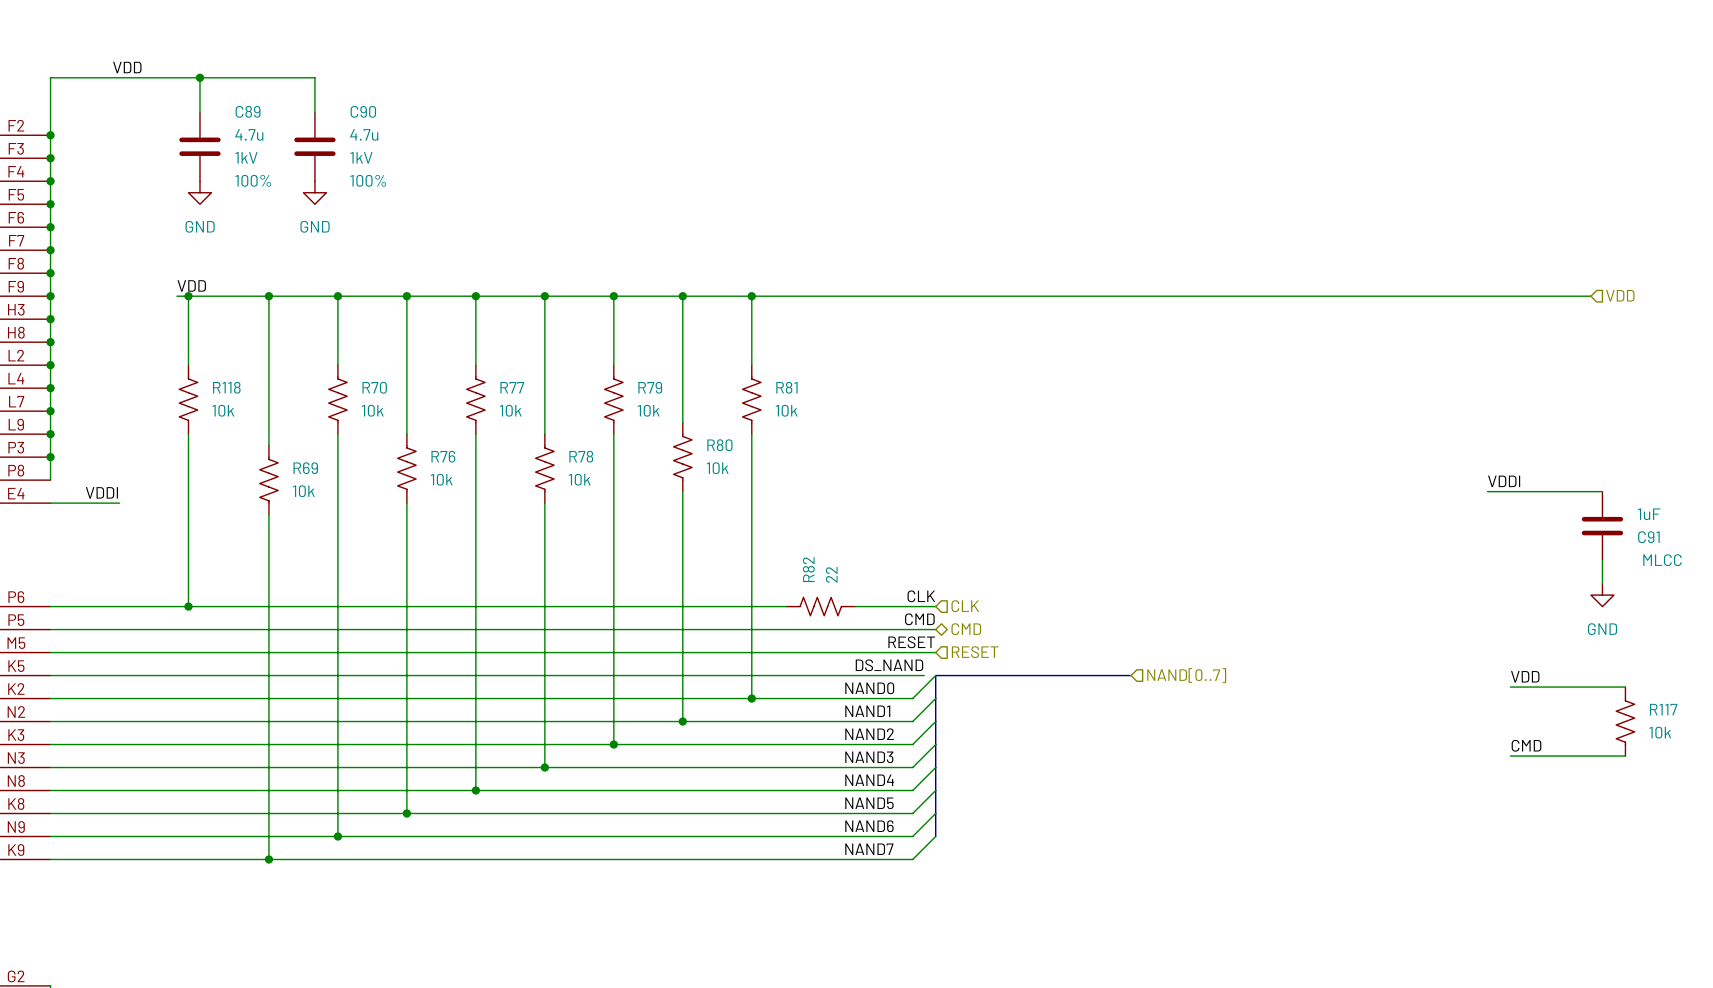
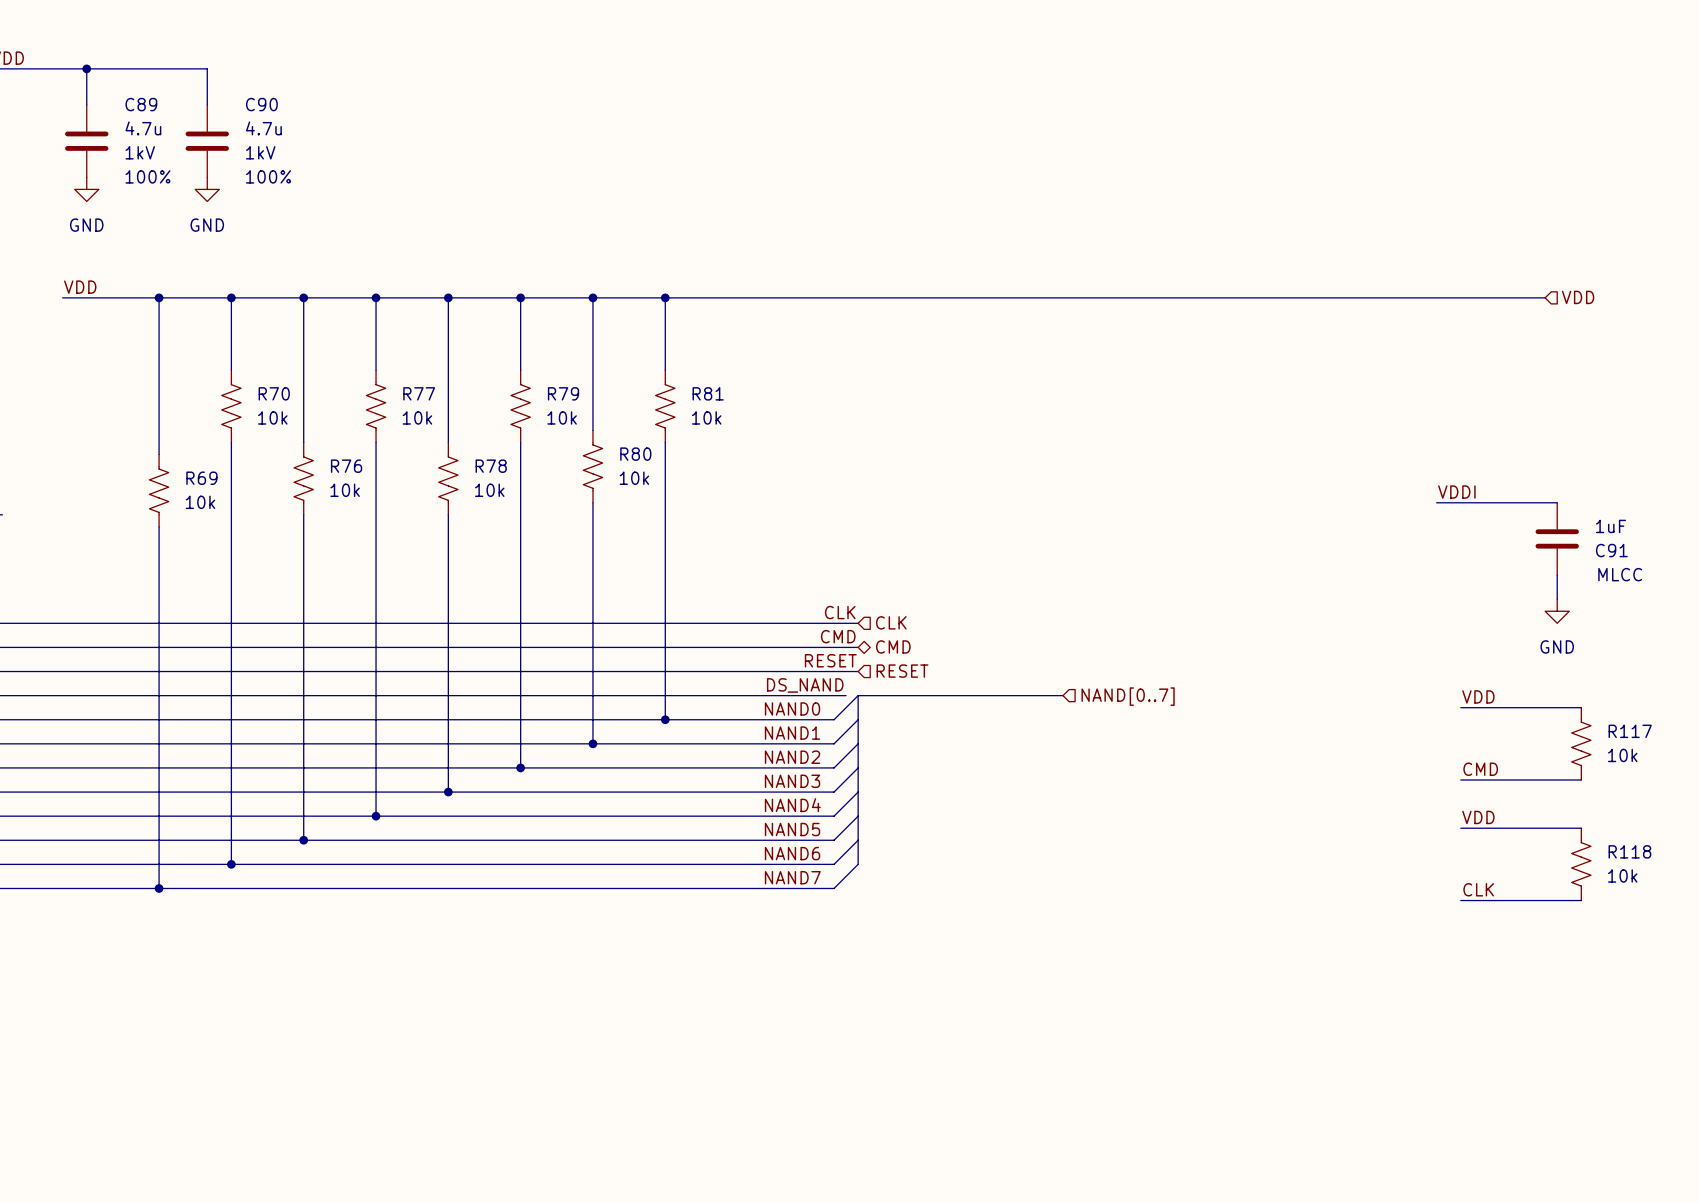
wire: (188, 296) (188, 365) -> none
junction: (188, 296) -> none
R118 position: (188, 399) -> (1581, 864)
wire: (188, 434) (188, 606) -> none
junction: (188, 606) -> none
R82: 22 (820, 606) -> none
label: none -> VDD (1478, 817)
wire: none -> (1460, 828) (1581, 828)
label: none -> CLK (1478, 889)
wire: none -> (1460, 900) (1581, 900)

